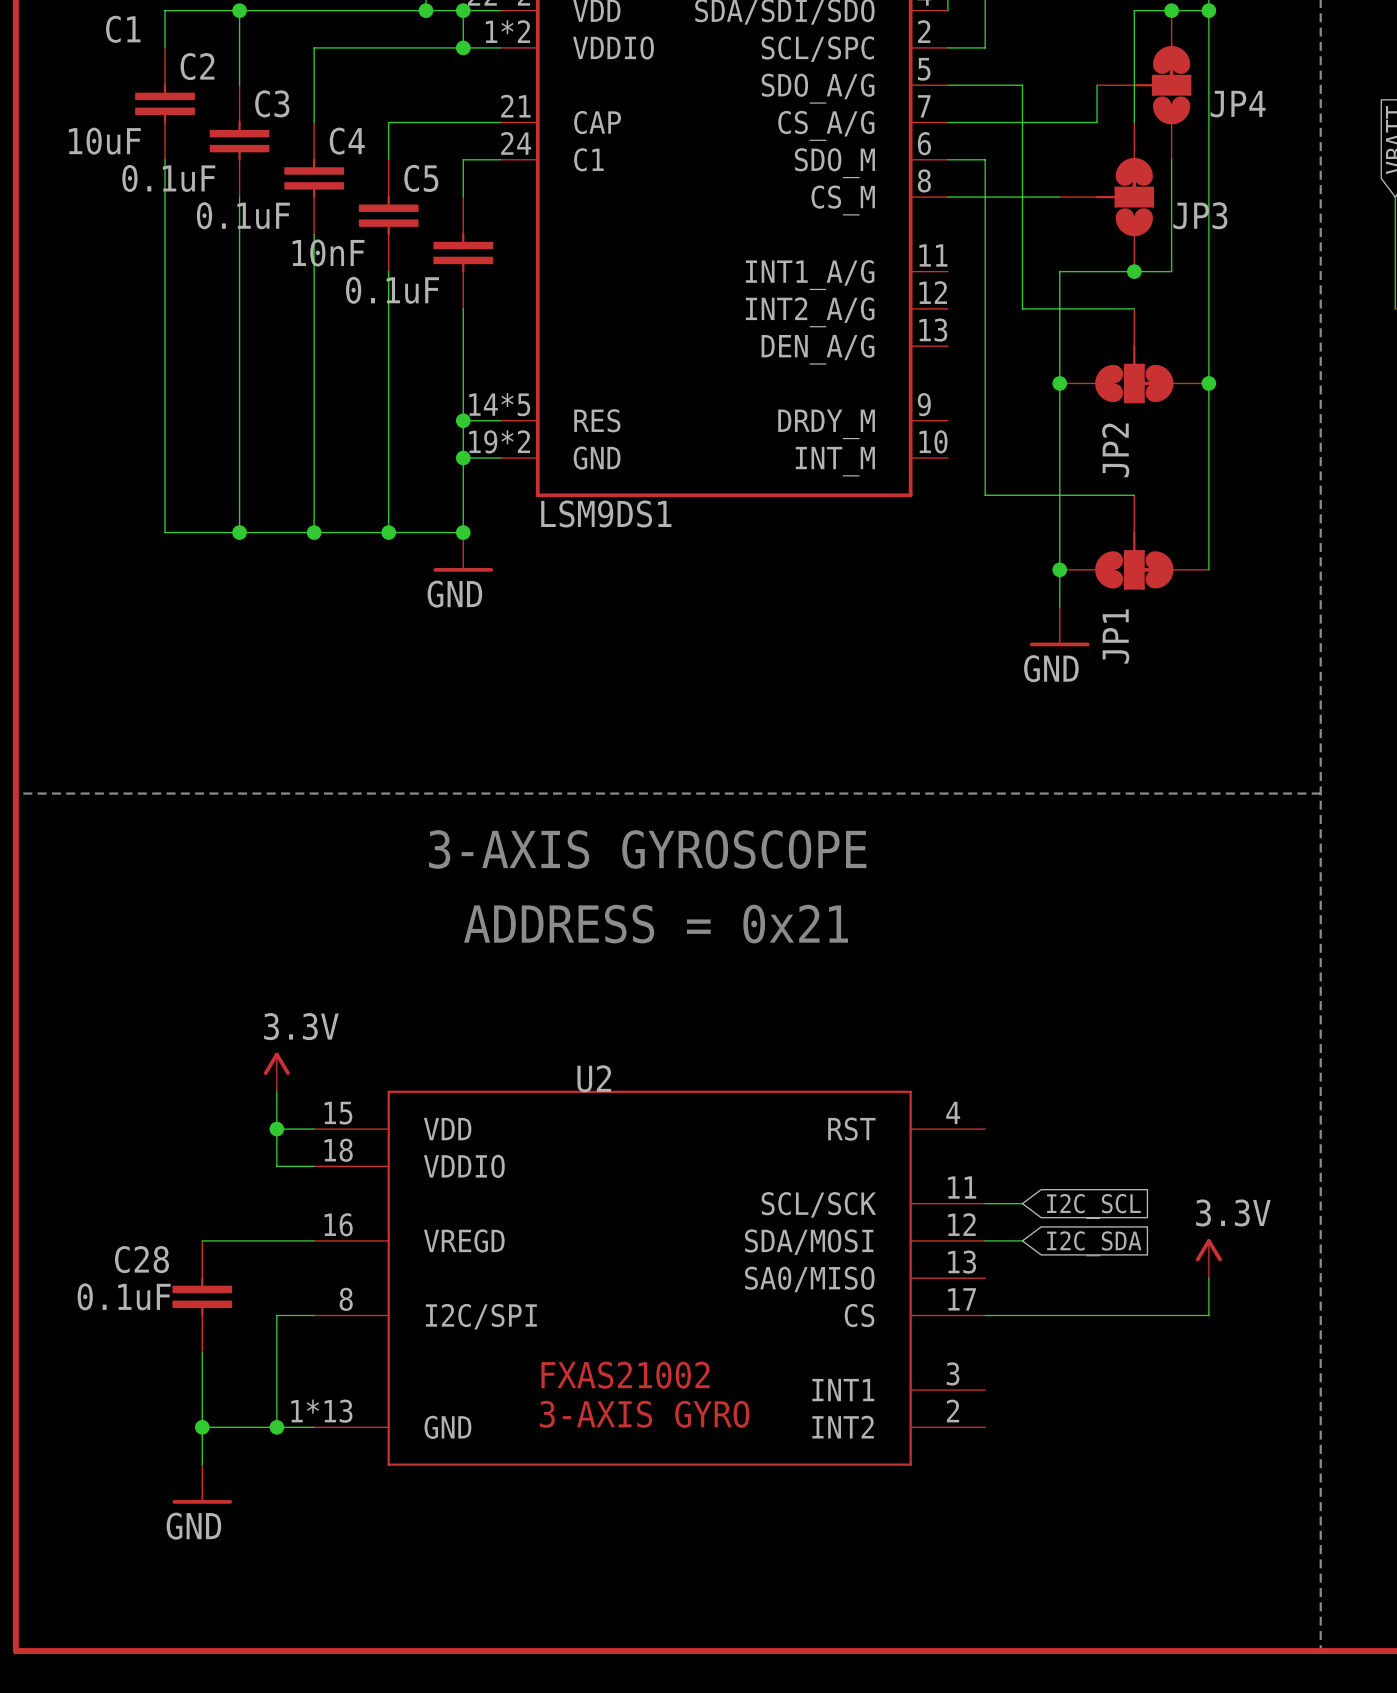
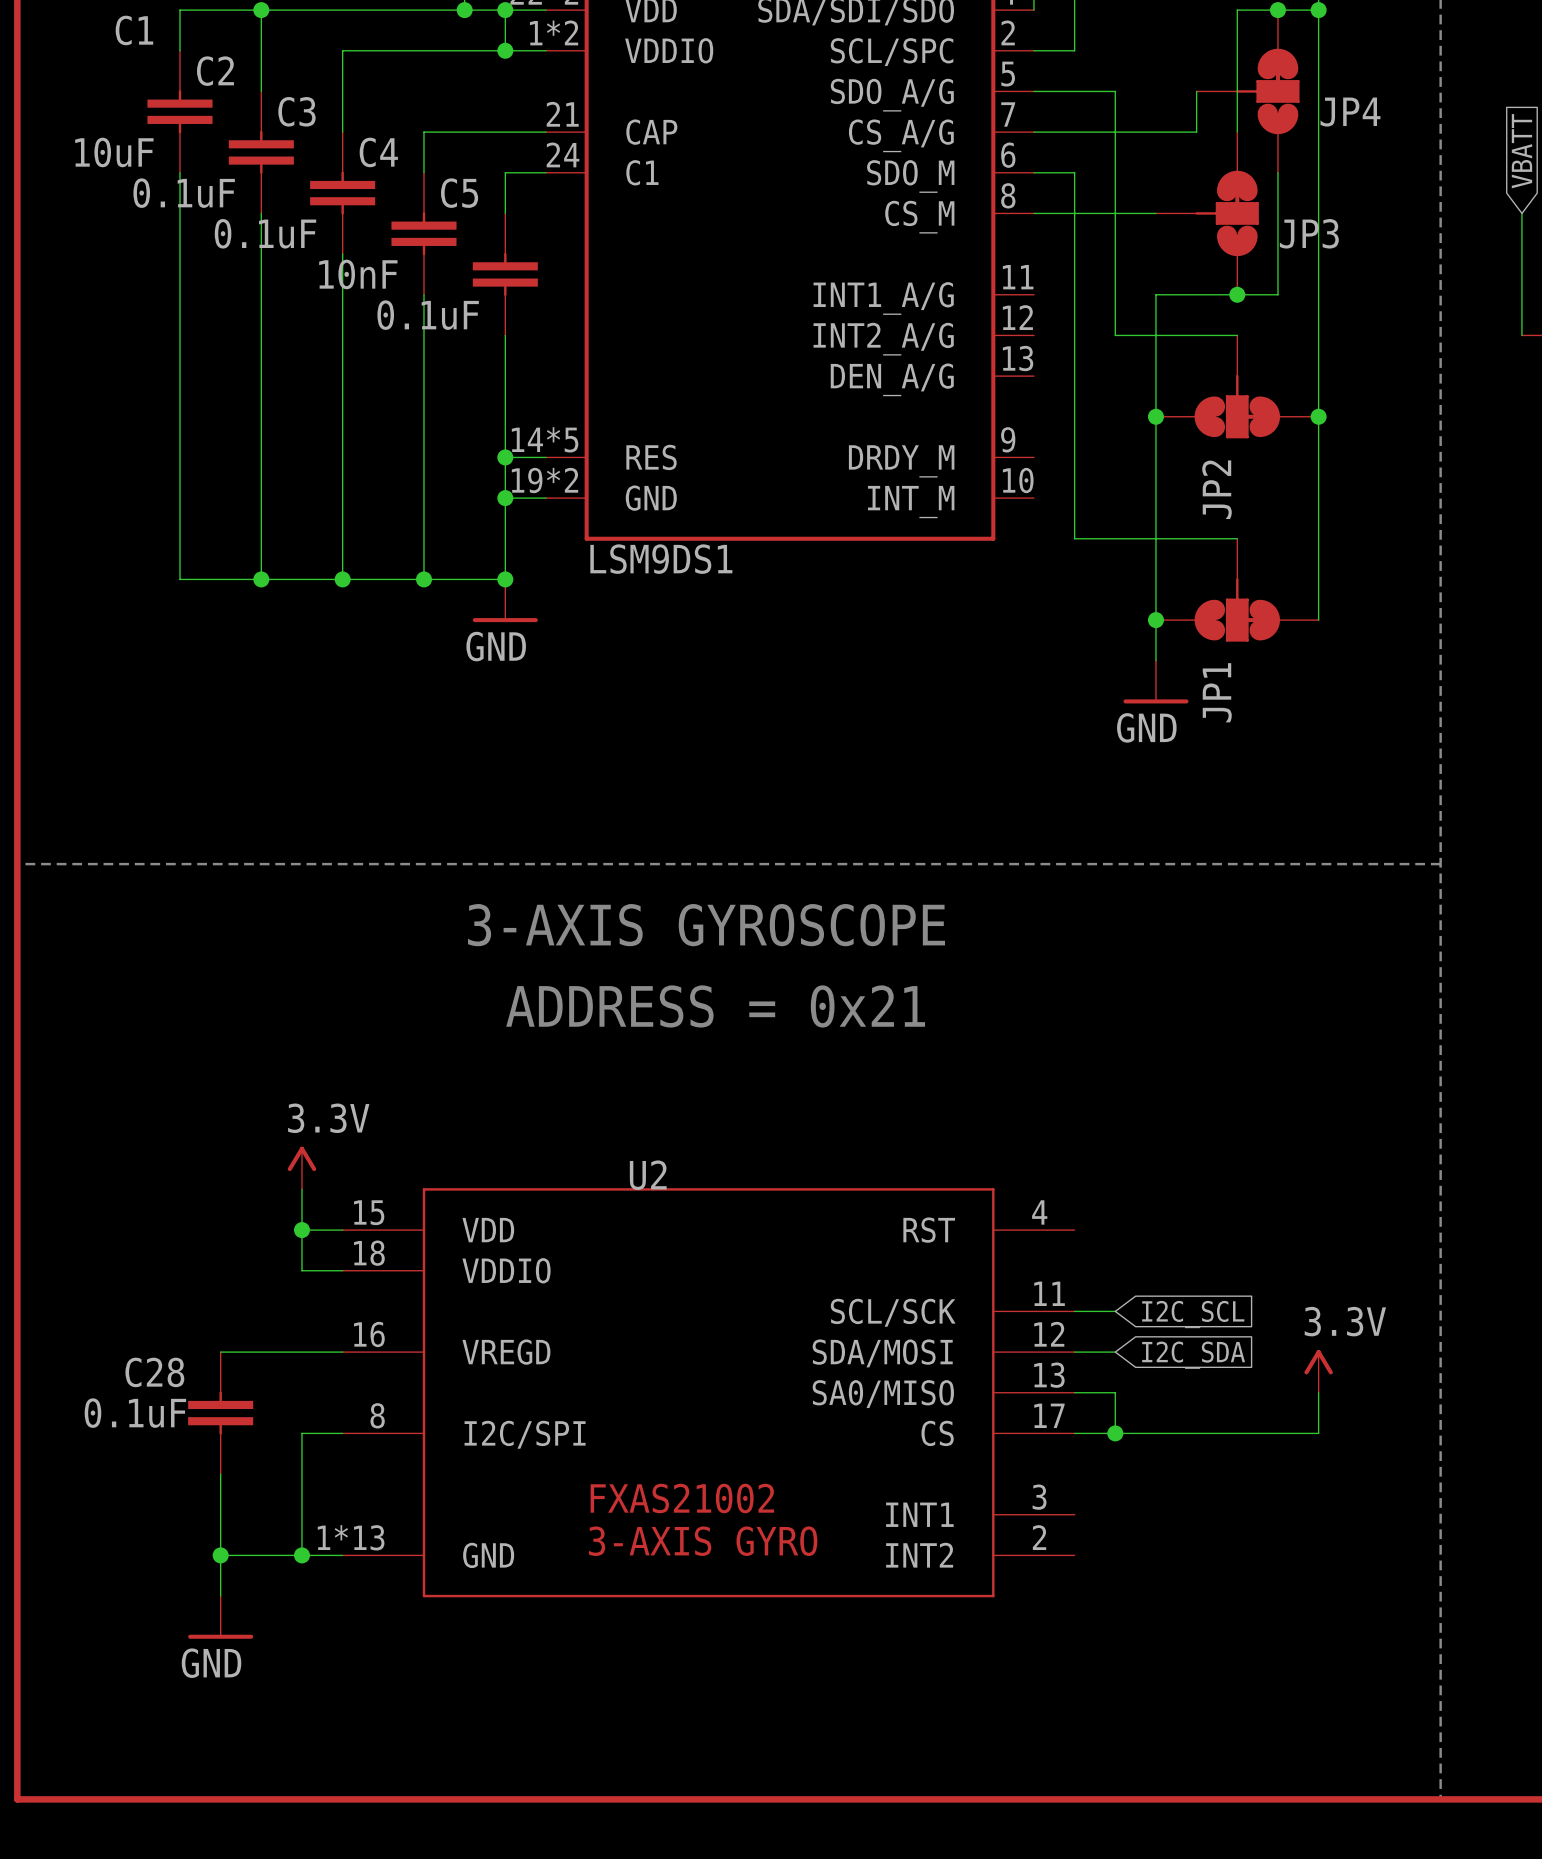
wire: none -> (1074, 1392) (1115, 1392) (1115, 1433)
junction: none -> (1115, 1433)

